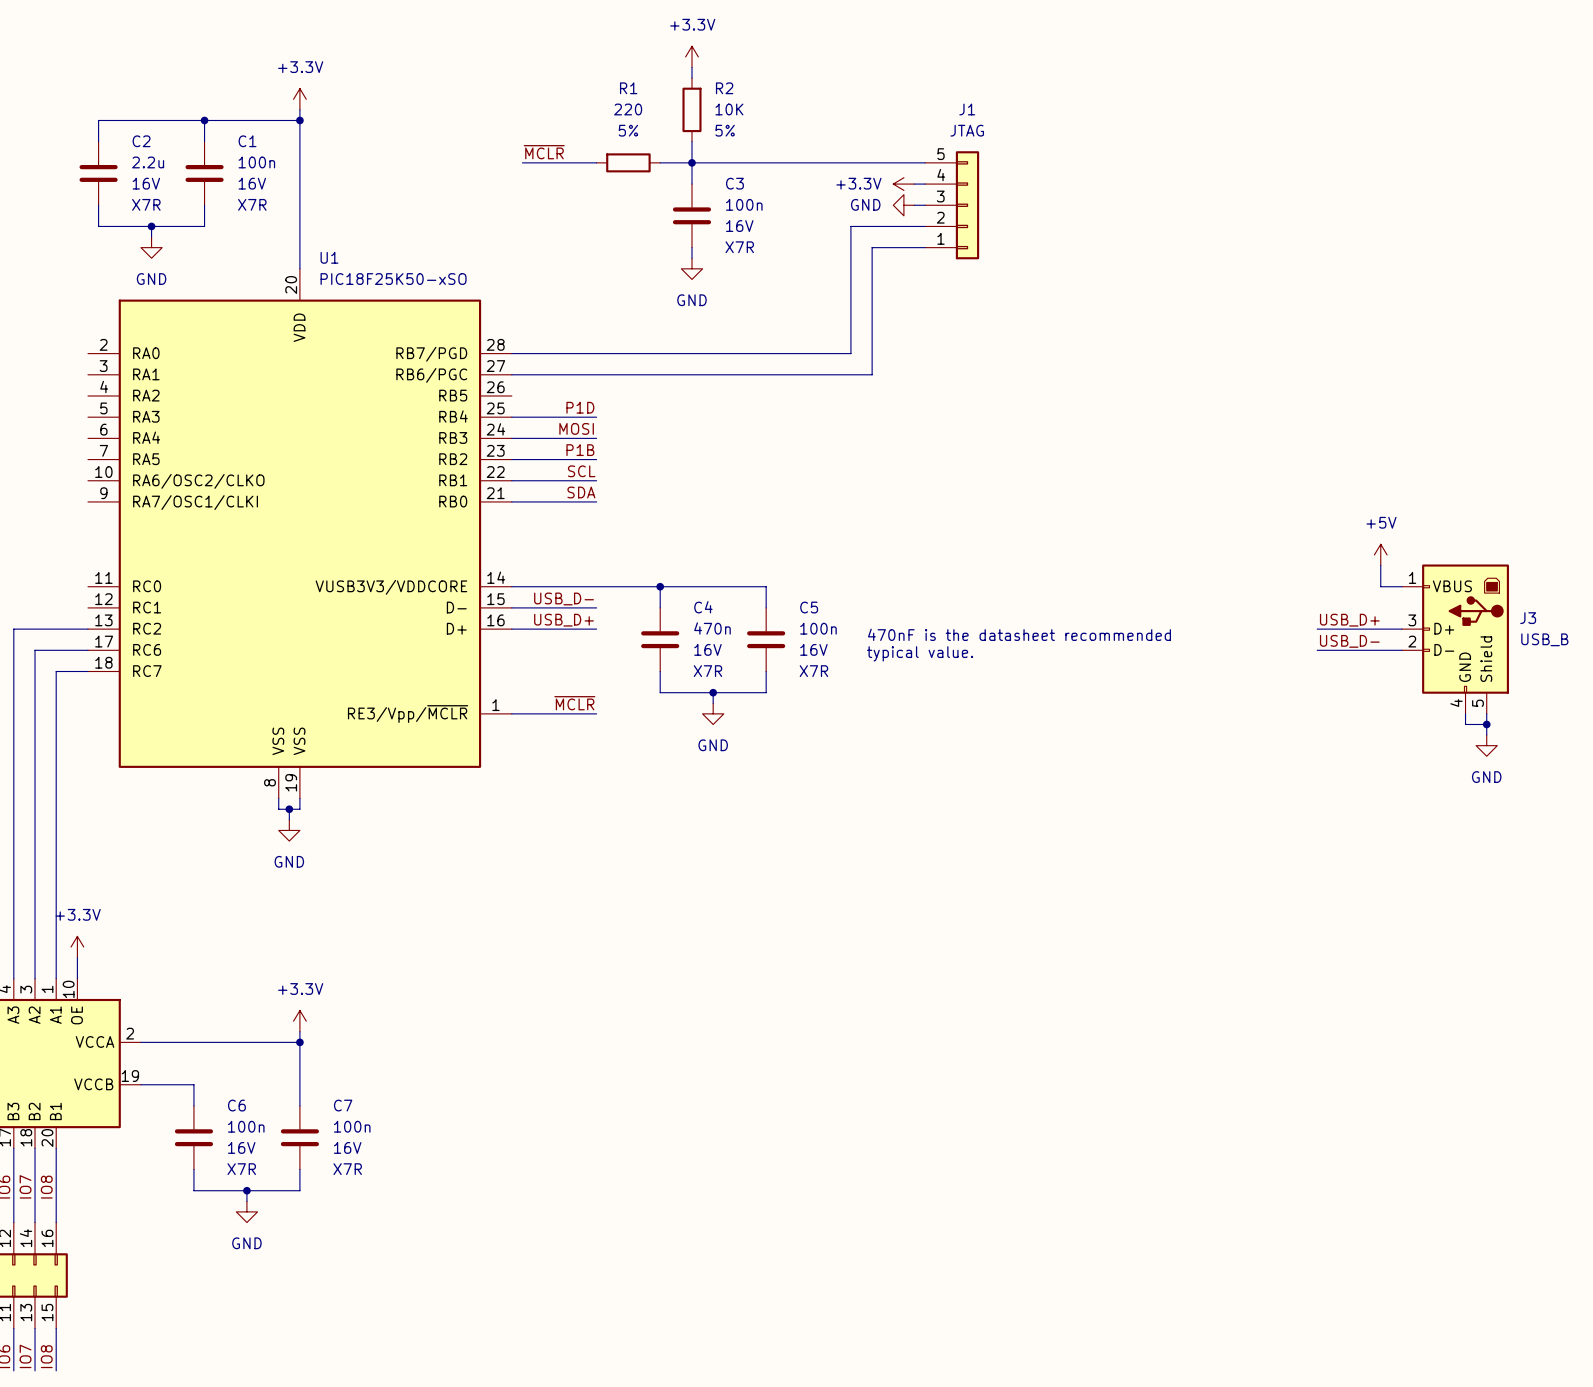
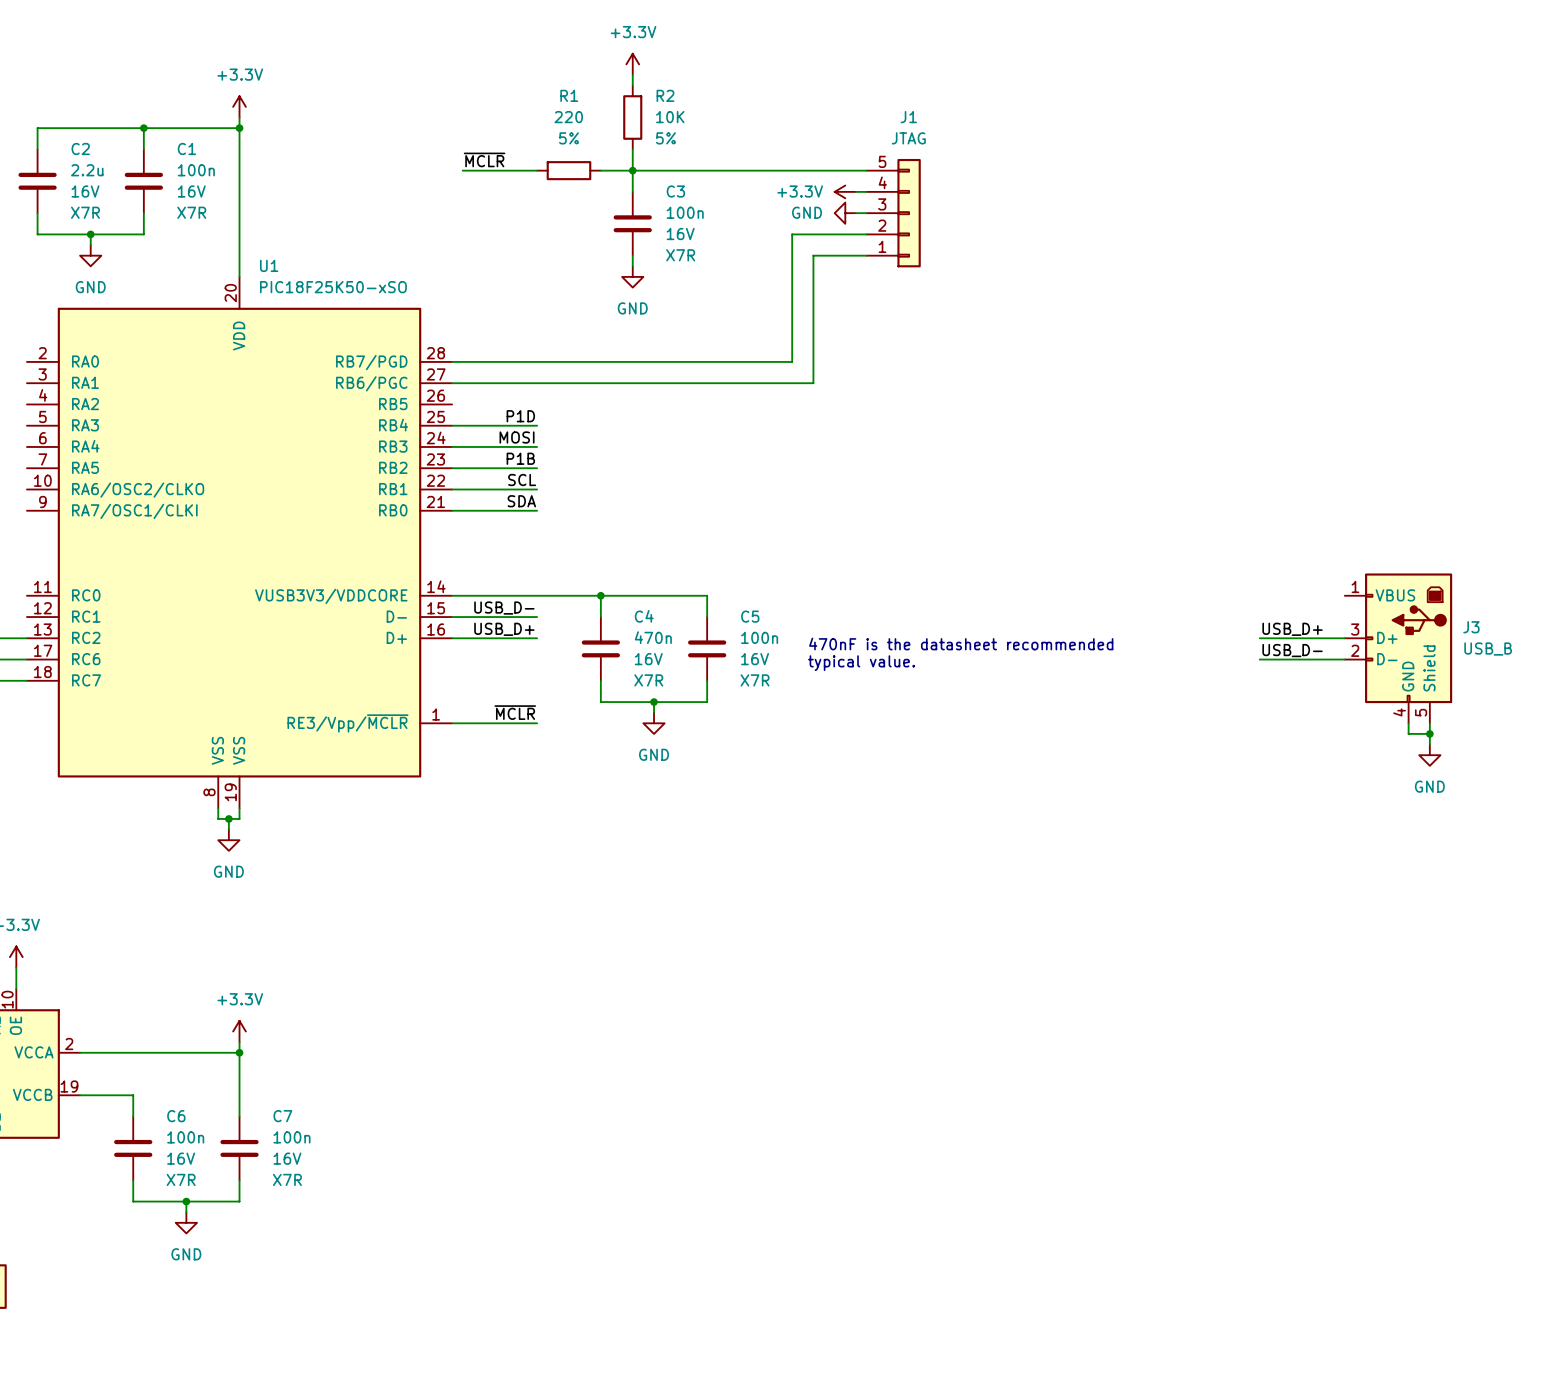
power symbol: +5V (1380, 554) -> none
wire: (1380, 565) (1380, 586) (1401, 586) -> none

